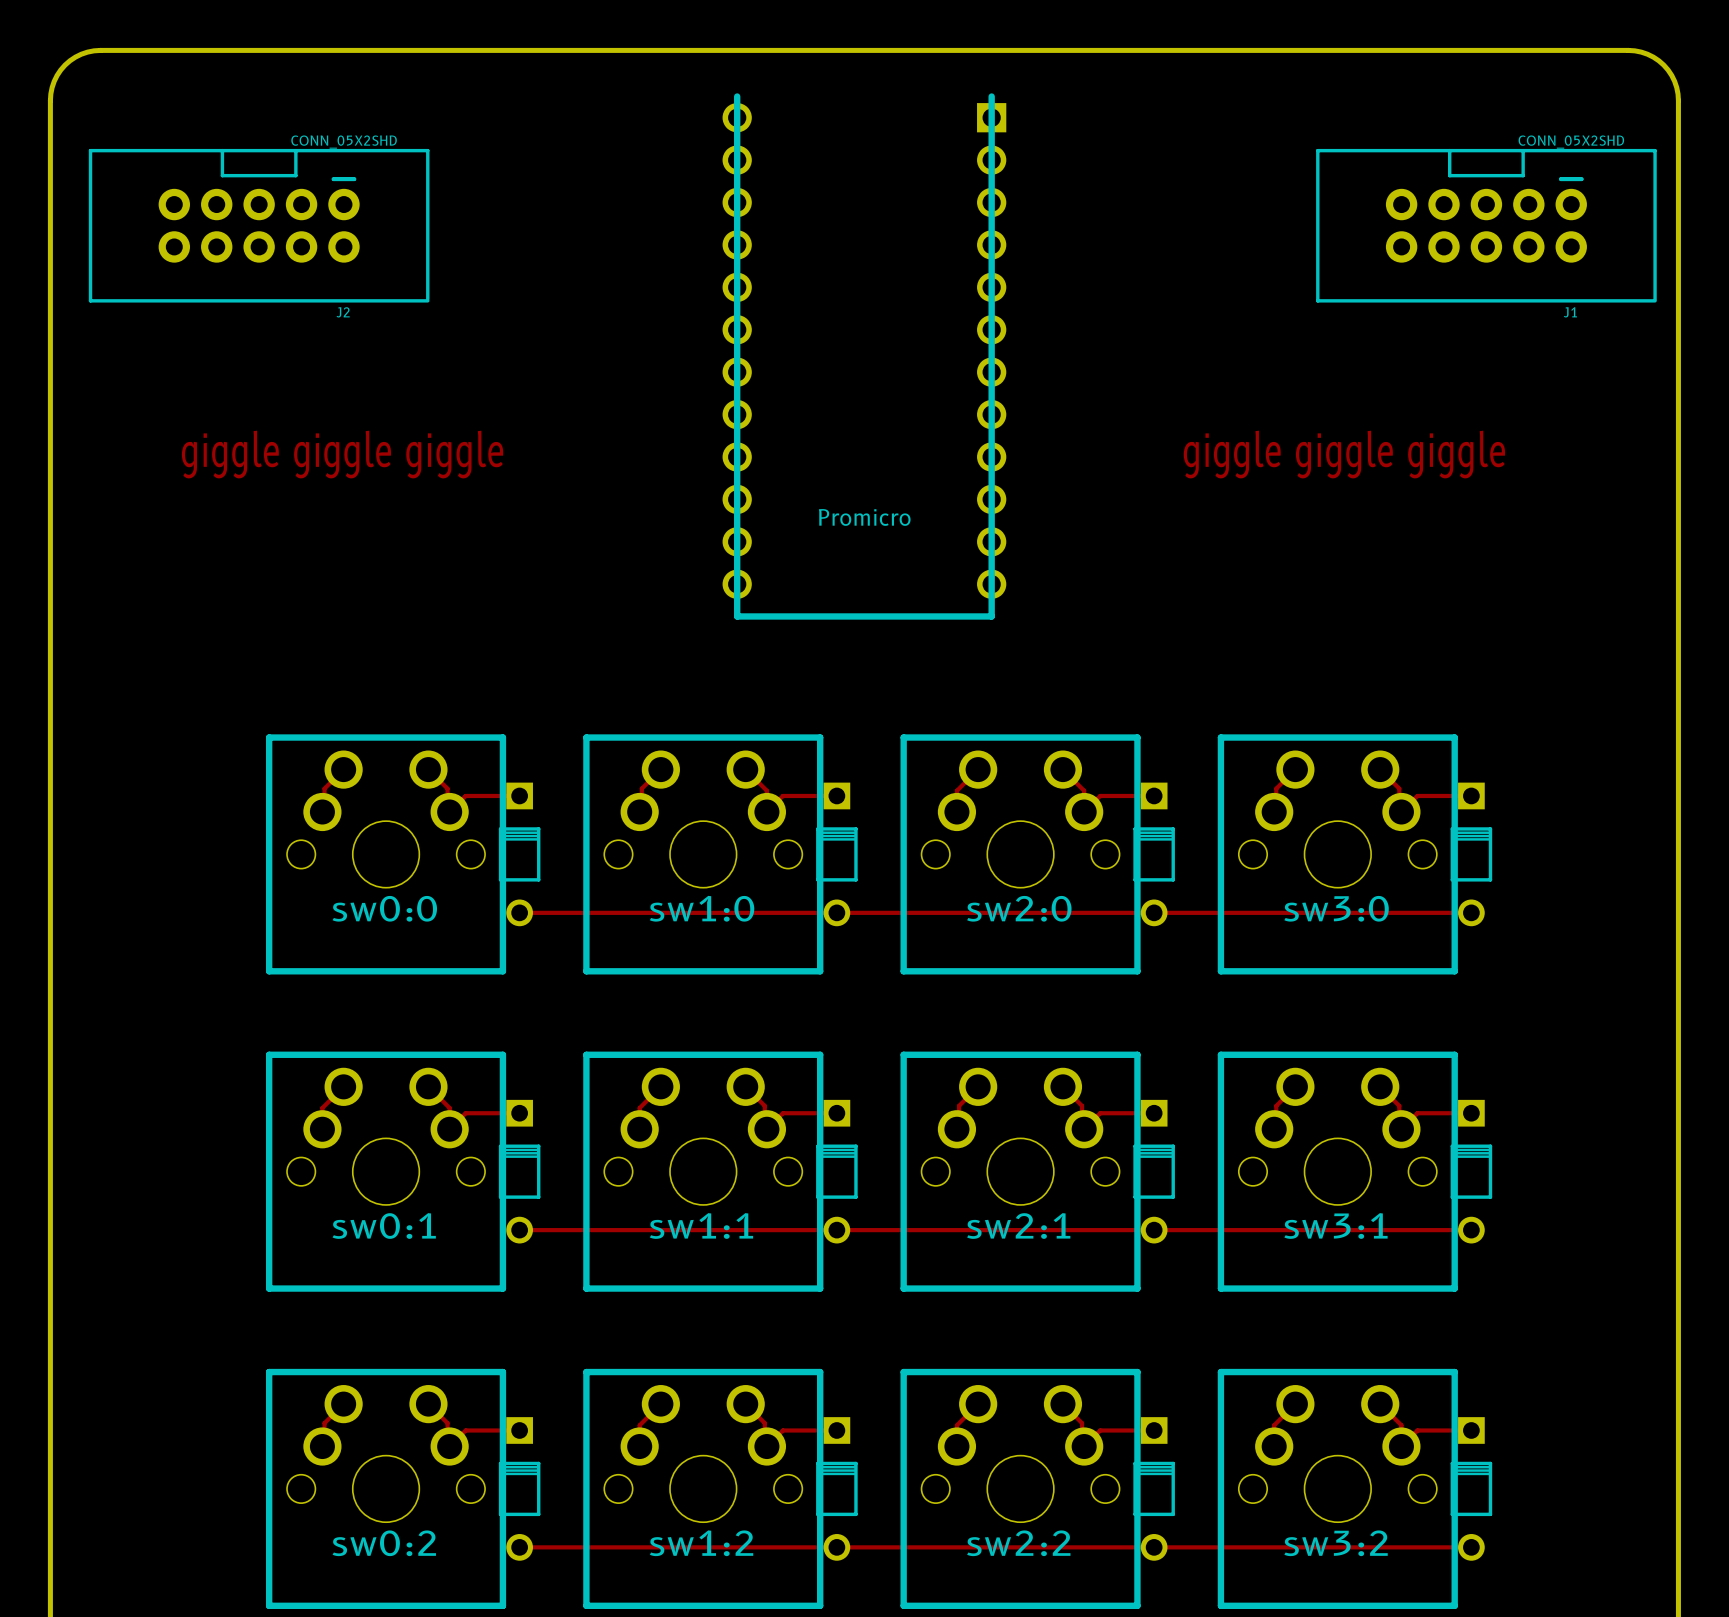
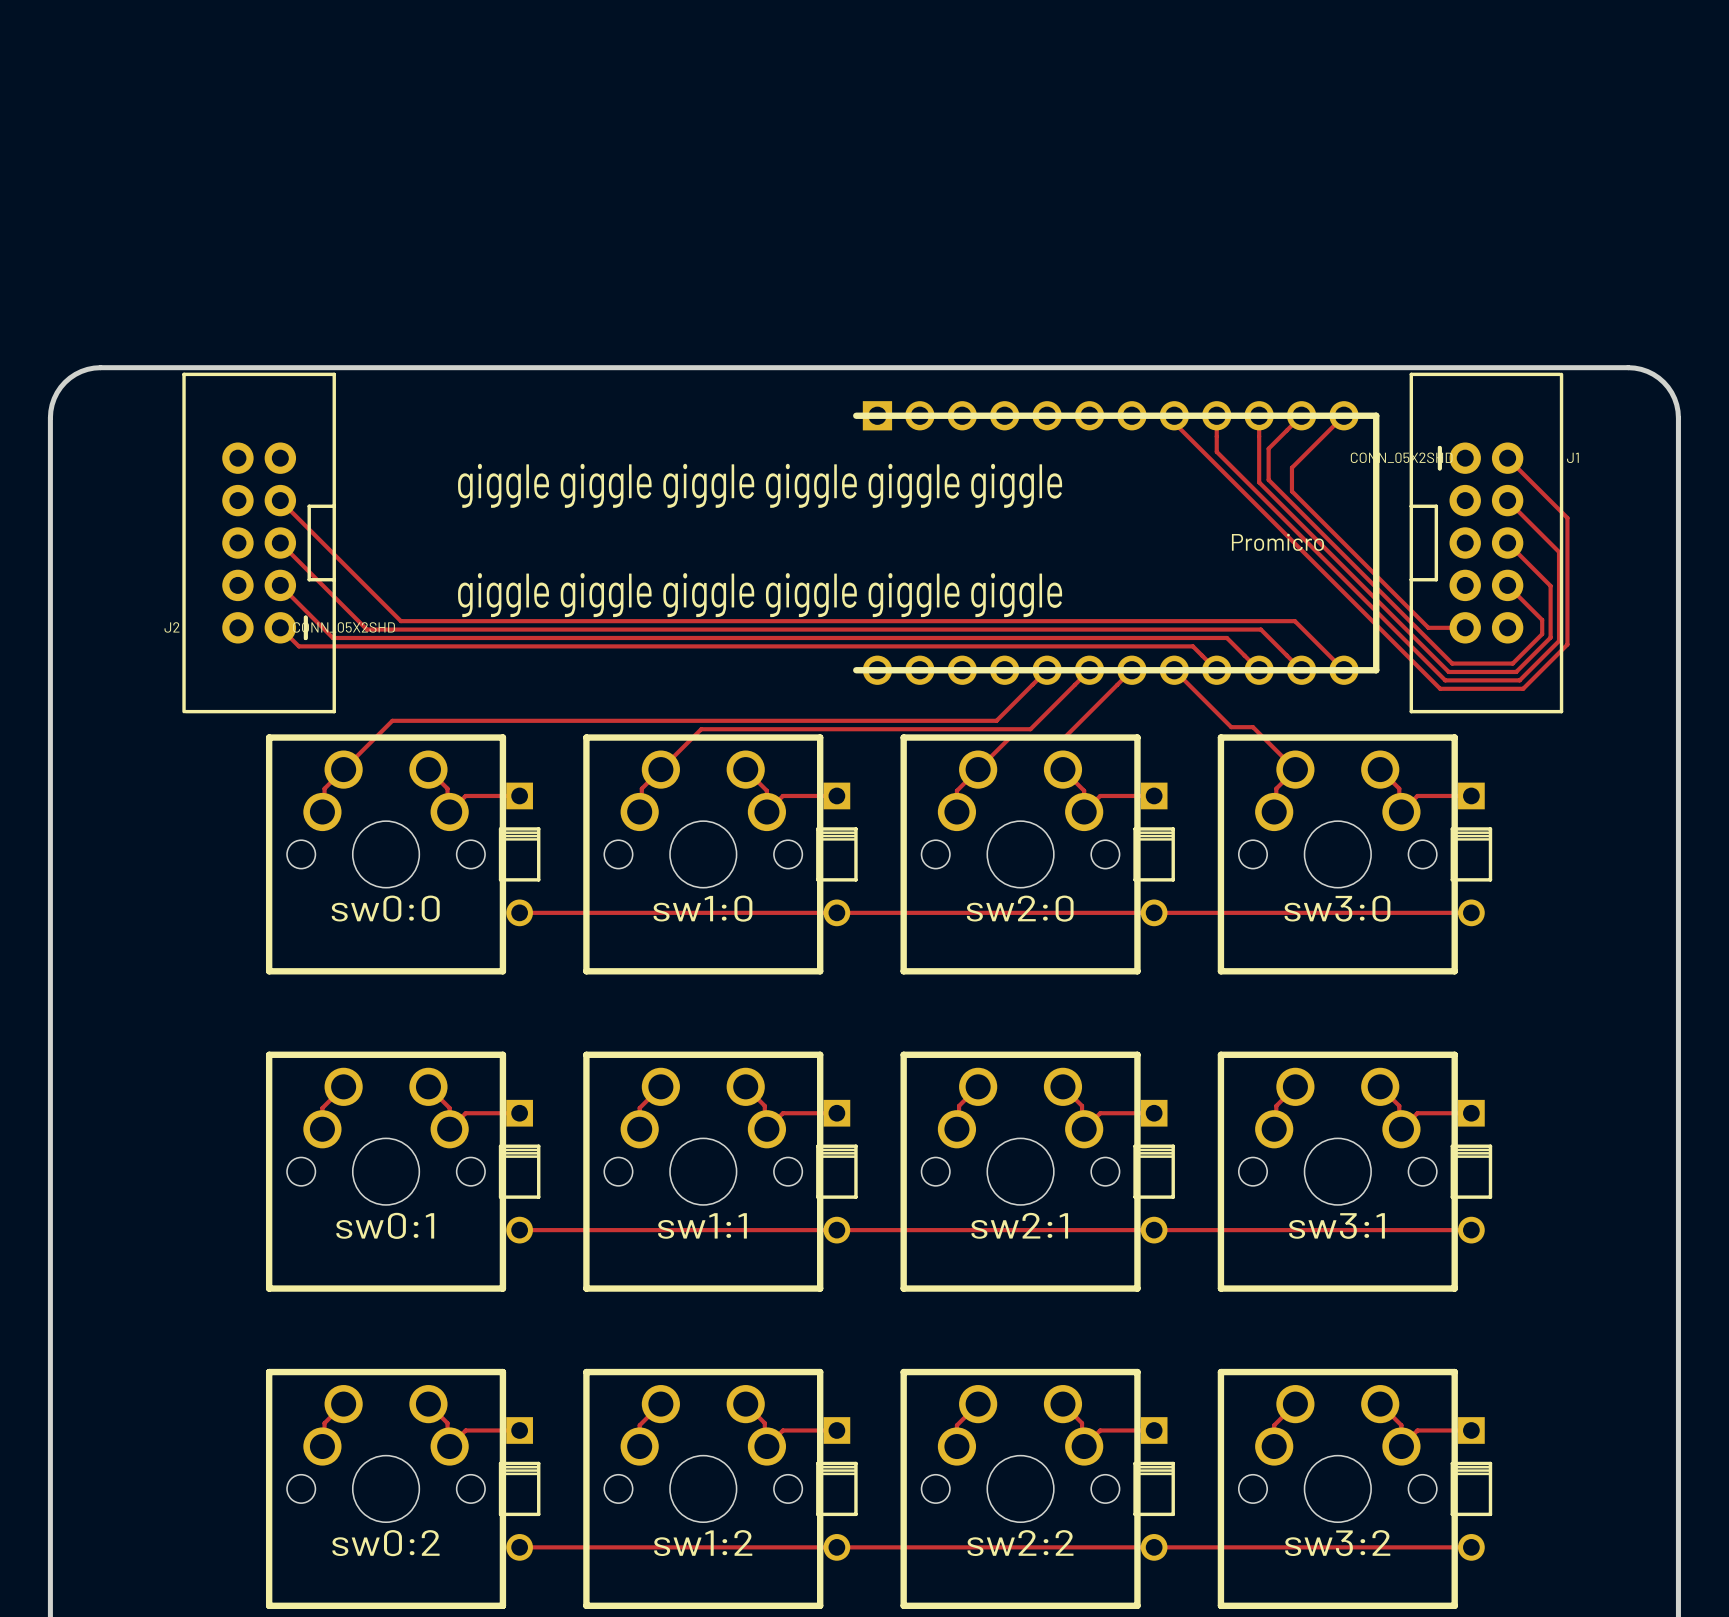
J2 rotation: 0° (259, 225) -> 90° clockwise (259, 543)
J2 position: (259, 225) -> (259, 543)
J1 rotation: 0° (1486, 225) -> 90° counterclockwise (1486, 543)
J1 position: (1486, 225) -> (1486, 543)
Promicro rotation: 0° (864, 356) -> 90° counterclockwise (1116, 543)
track: none -> (1174, 415) (1174, 422) (1440, 688) (1523, 688) (1567, 644) (1567, 517) (1507, 458)
track: none -> (1216, 415) (1216, 451) (1445, 680) (1519, 680) (1559, 641) (1559, 551) (1507, 500)
track: none -> (1259, 415) (1259, 482) (1448, 671) (1516, 671) (1550, 637) (1550, 585) (1507, 543)
track: none -> (1301, 415) (1268, 448) (1268, 479) (1452, 663) (1512, 663) (1542, 634) (1542, 619) (1507, 585)
track: none -> (1343, 415) (1291, 467) (1291, 491) (1428, 627) (1465, 627)
board edge: (50, 417) (50, 93) (57, 75) (70, 60) (87, 52) (100, 50) (1628, 50) (1641, 52) (1653, 57) (1663, 65) (1674, 81) (1678, 93) (1678, 417) -> (50, 417) (54, 398) (65, 382) (81, 371) (100, 367) (1628, 367) (1647, 371) (1663, 382) (1674, 398) (1678, 417)
text: giggle giggle giggle (342, 454) -> none
text: giggle giggle giggle (1344, 454) -> none
text: none -> giggle giggle giggle giggle giggle giggle (760, 485)
track: none -> (280, 500) (400, 621) (1294, 621) (1343, 670)
track: none -> (280, 543) (366, 629) (1260, 629) (1301, 670)
track: none -> (280, 585) (332, 637) (1226, 637) (1259, 670)
text: none -> giggle giggle giggle giggle giggle giggle (760, 595)
track: none -> (280, 627) (298, 646) (1192, 646) (1216, 670)
track: none -> (1047, 670) (996, 720) (392, 720) (343, 769)
track: none -> (1089, 670) (1030, 729) (701, 729) (660, 769)
track: none -> (1131, 670) (1064, 737) (1009, 737) (978, 769)
track: none -> (1174, 670) (1231, 727) (1252, 727) (1295, 769)

